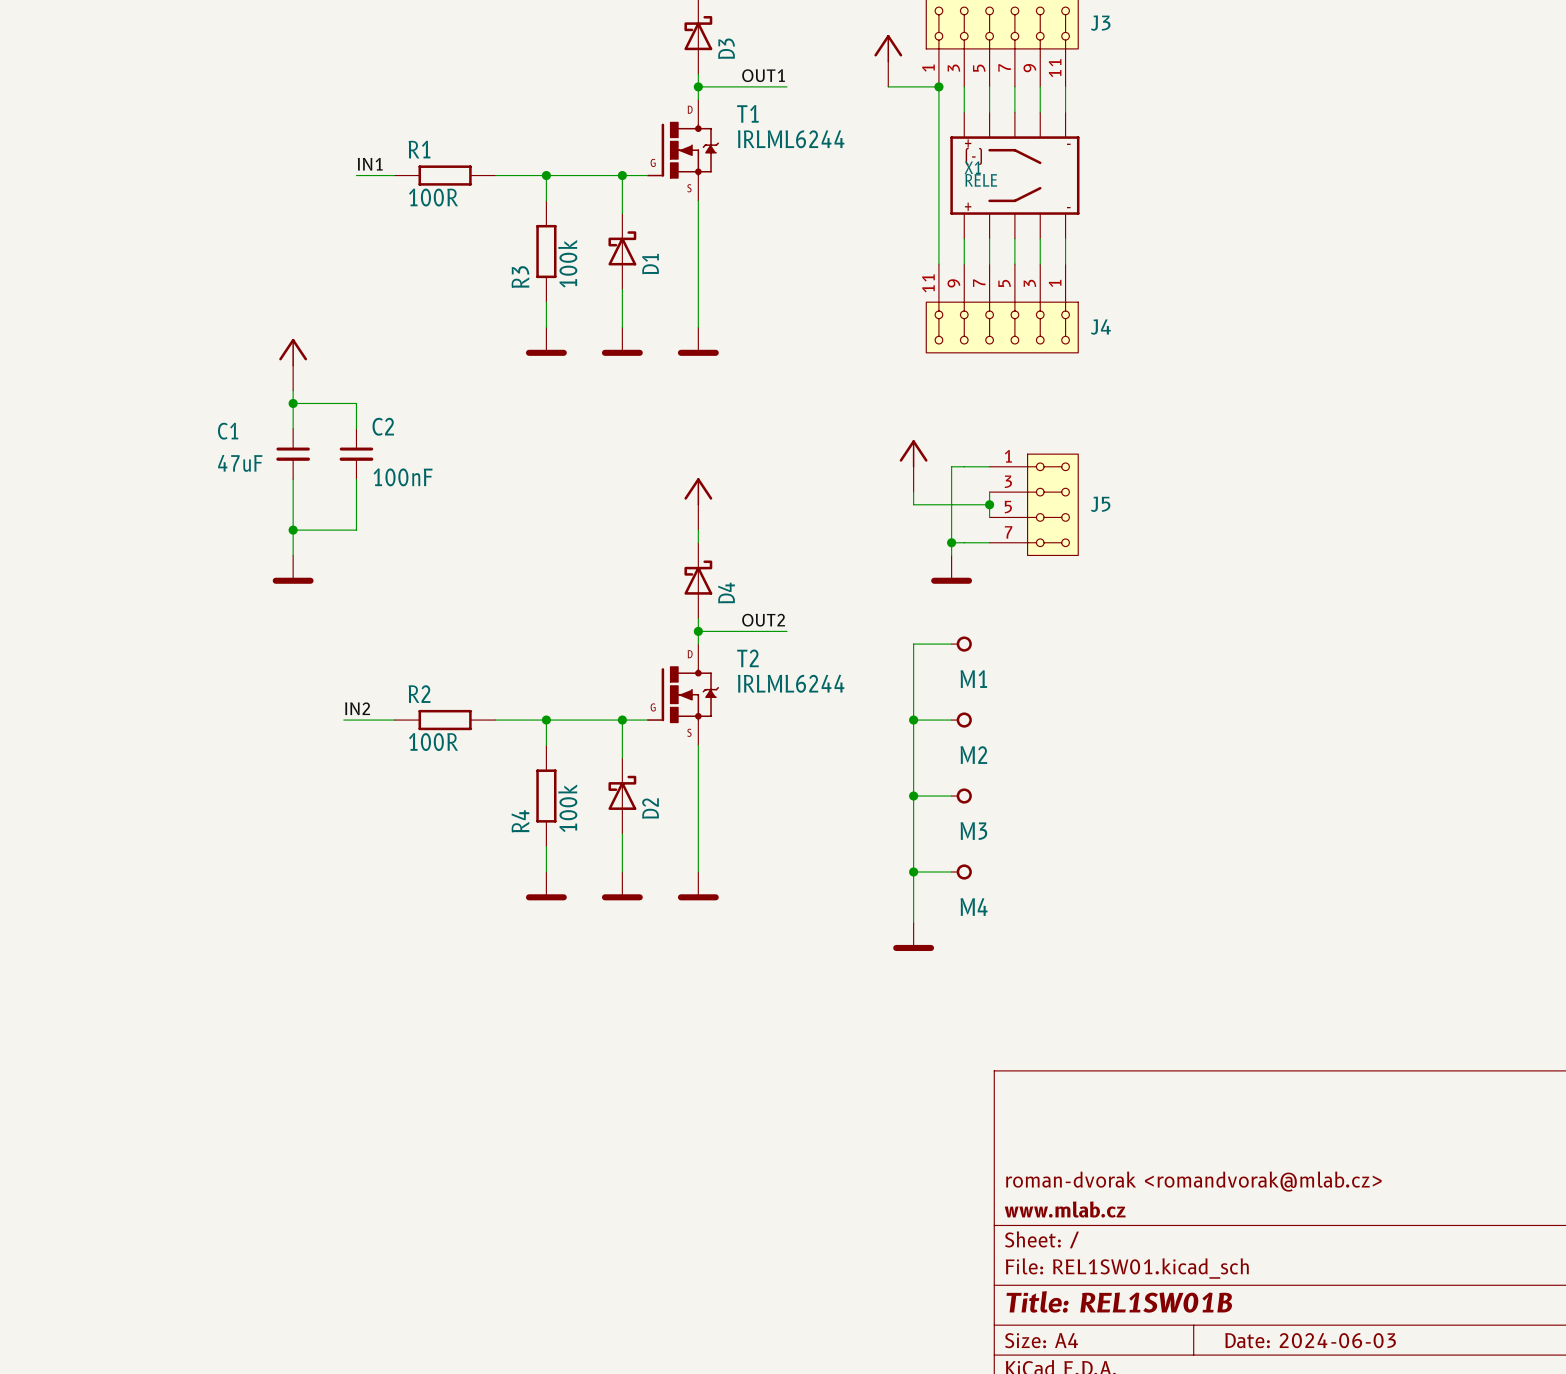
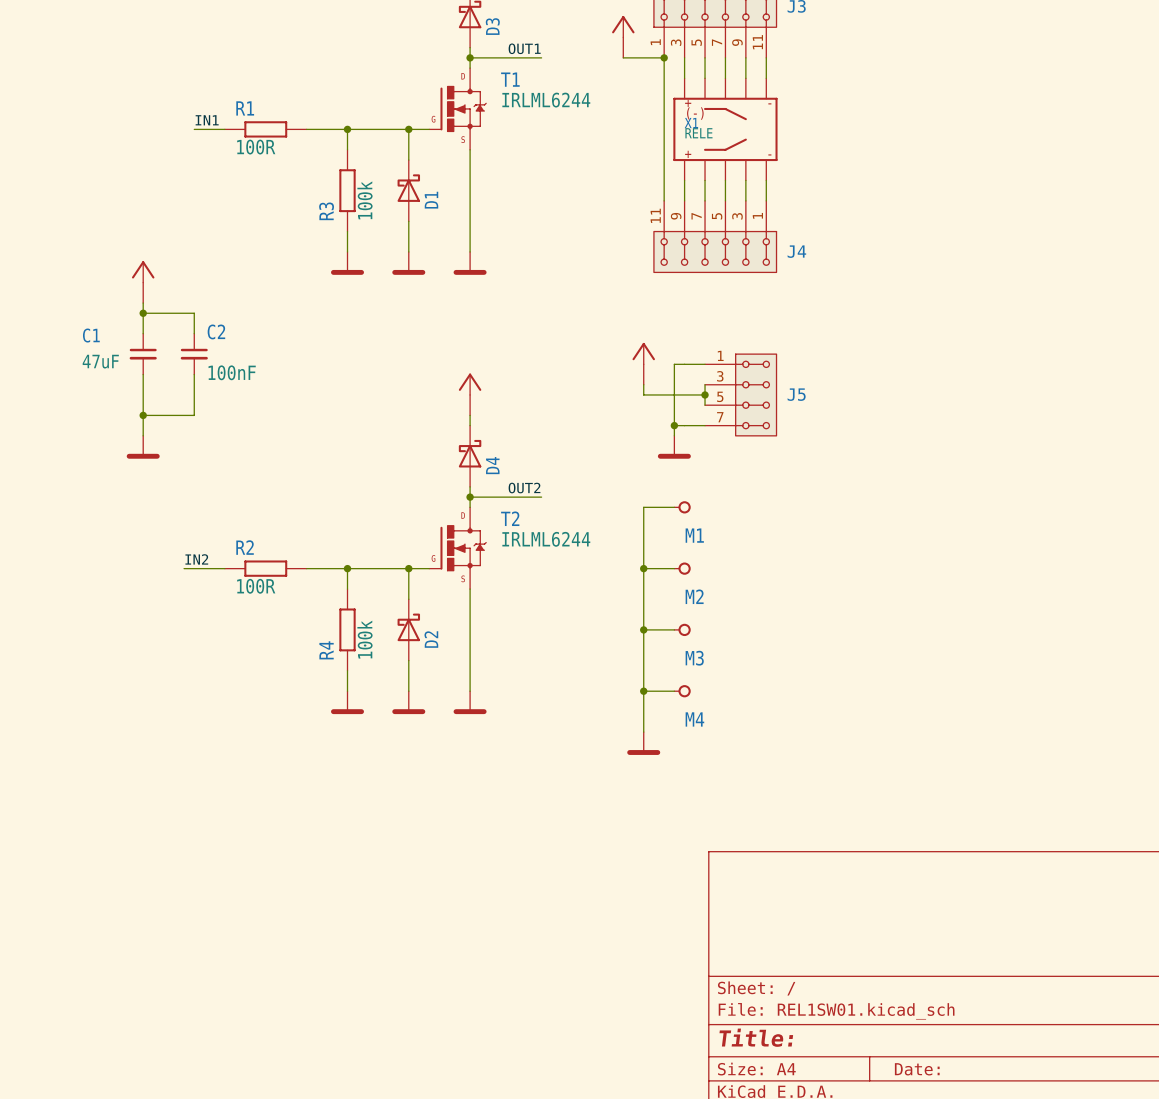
title block: roman-dvorak <romandvorak@mlab.cz> (1193, 1181) -> none
title block: www.mlab.cz (1065, 1209) -> none
title block: Title: REL1SW01B (1119, 1301) -> Title: (756, 1037)
title block: Date: 2024-06-03 (1310, 1340) -> Date: (917, 1069)

